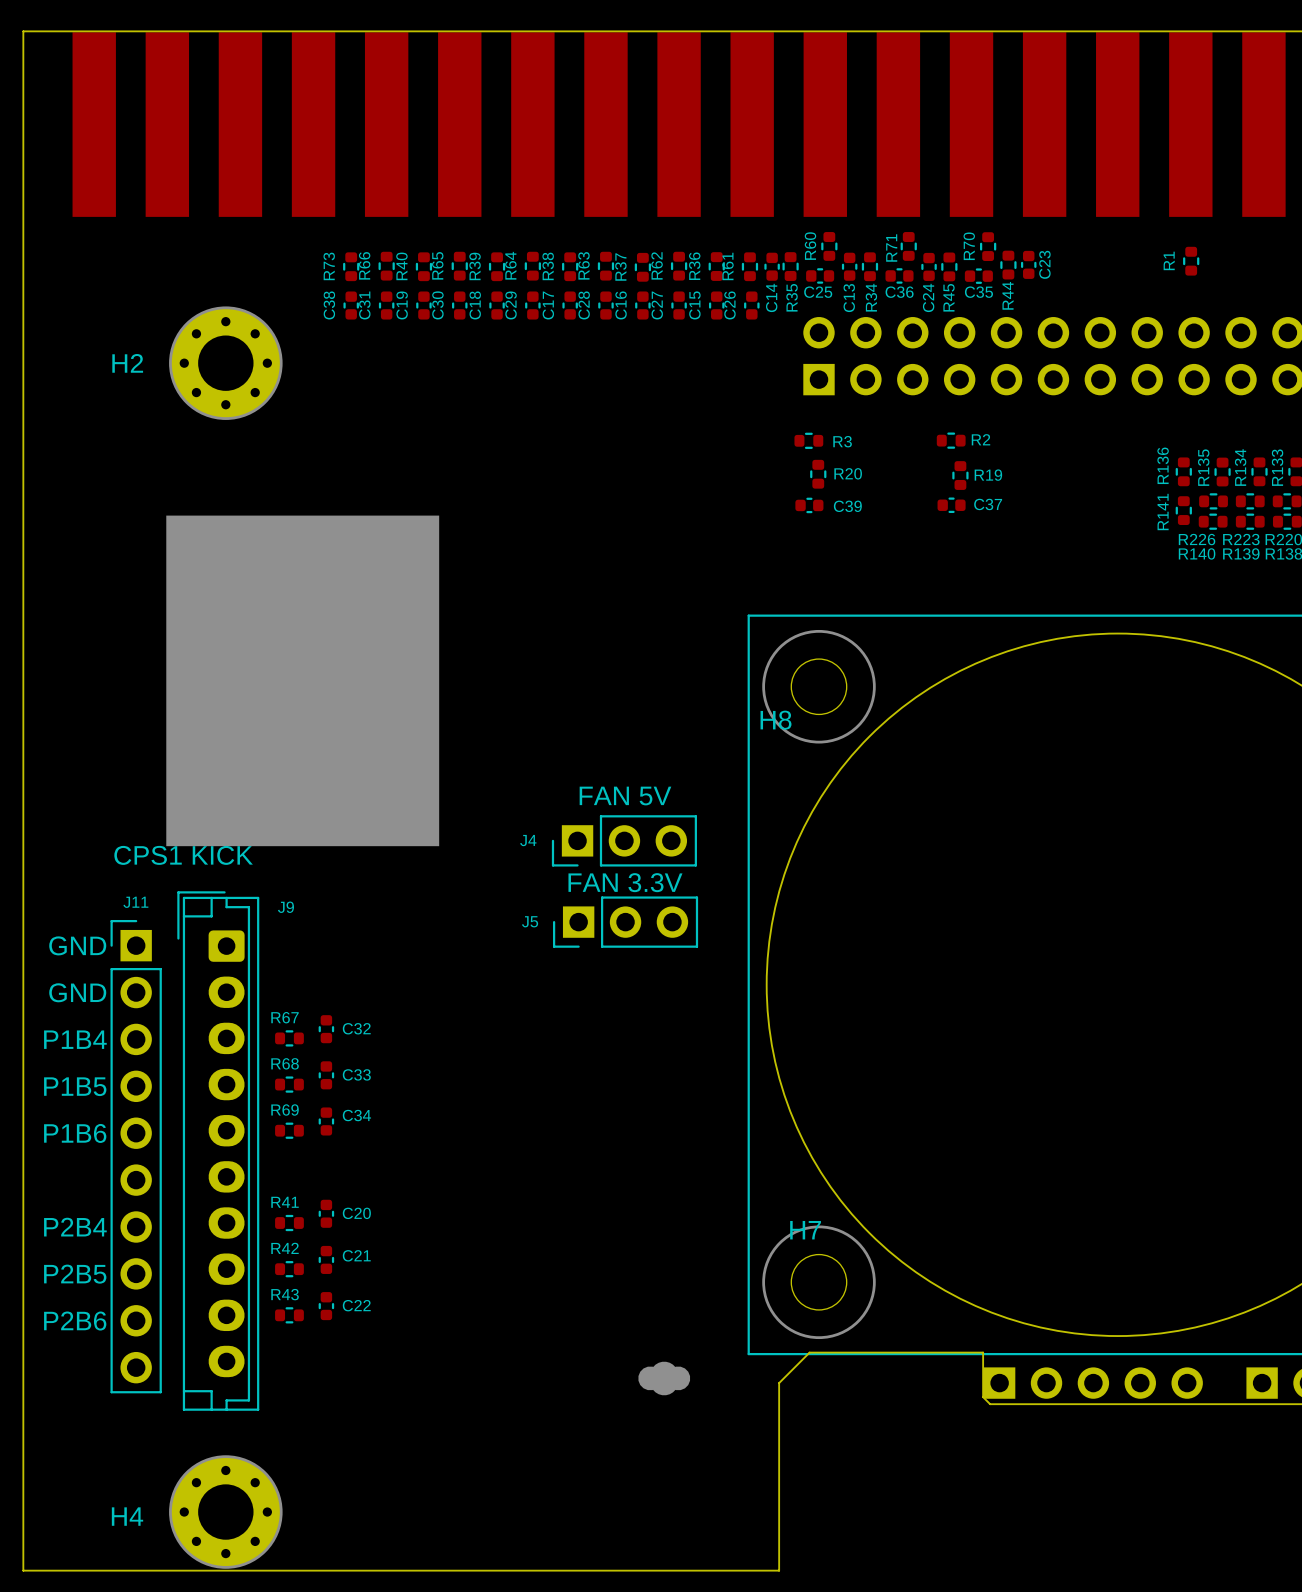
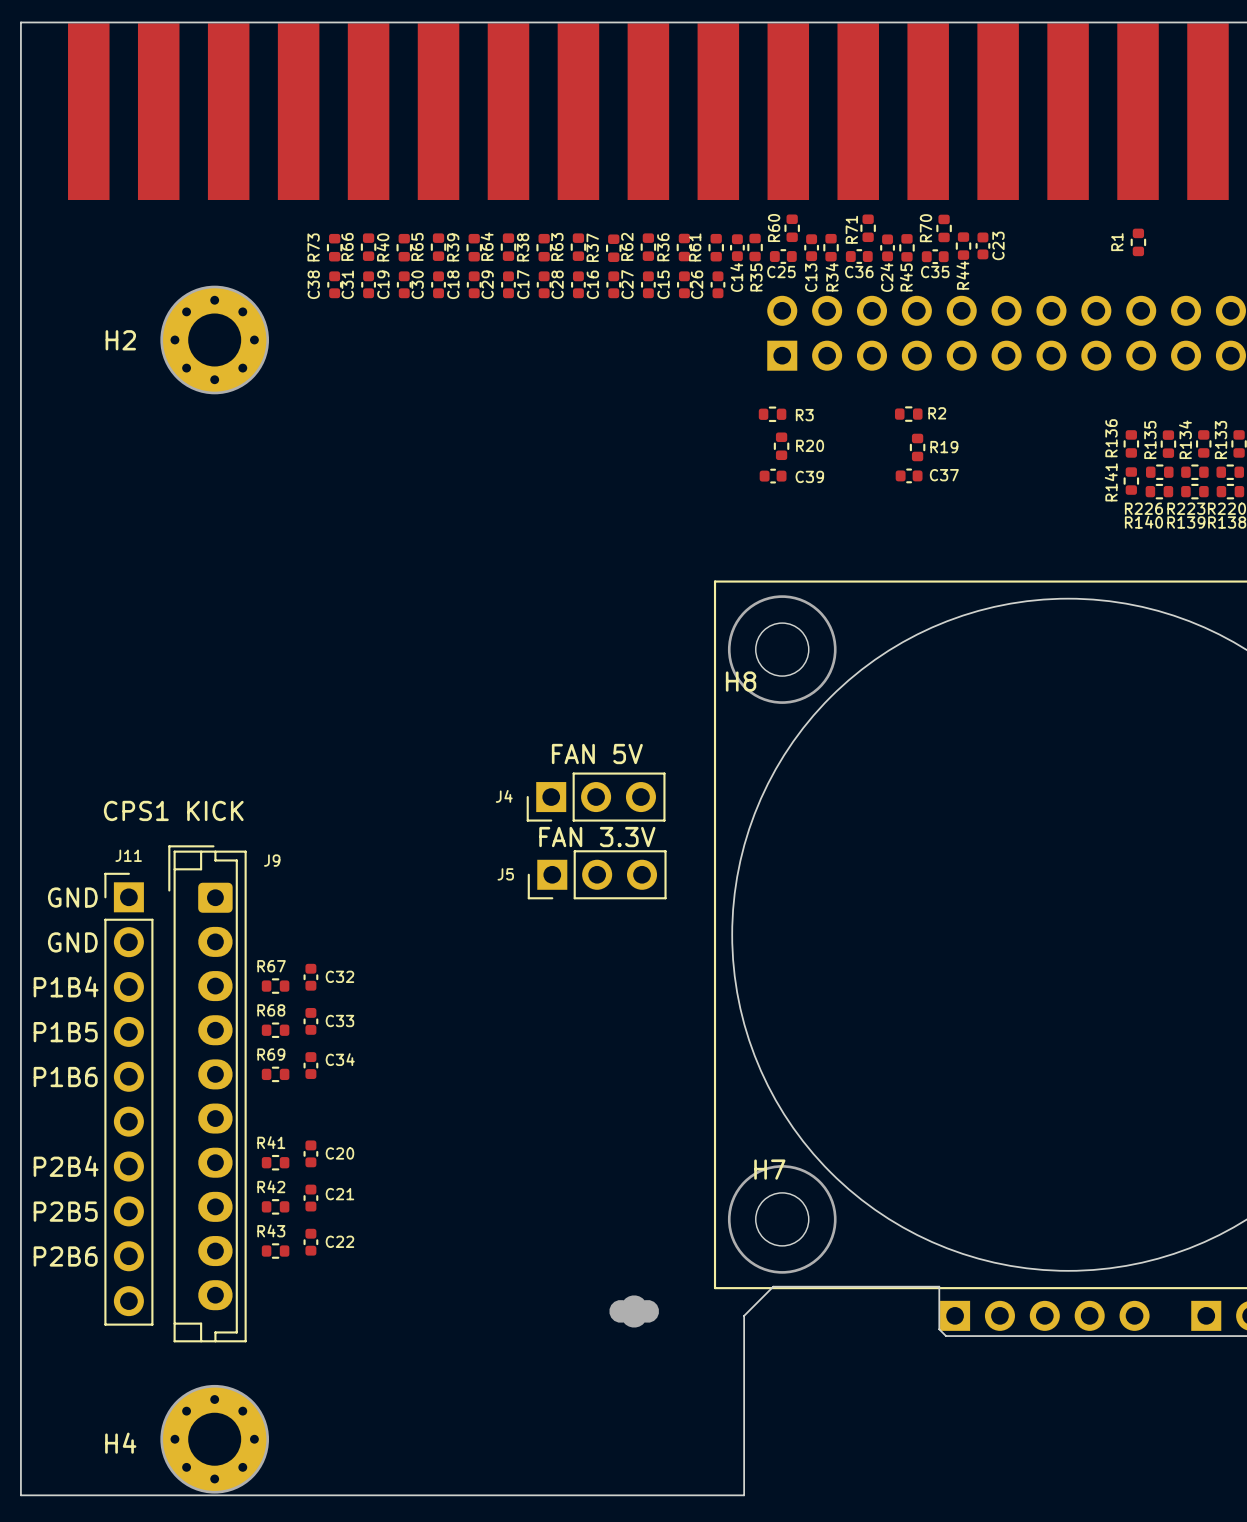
drawing: [166, 515, 440, 847] -> none

